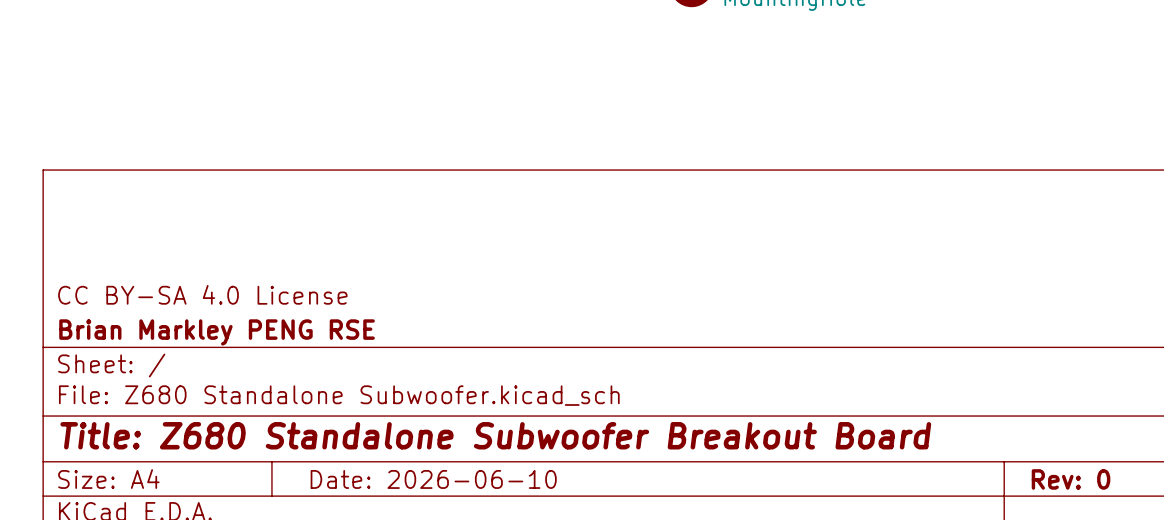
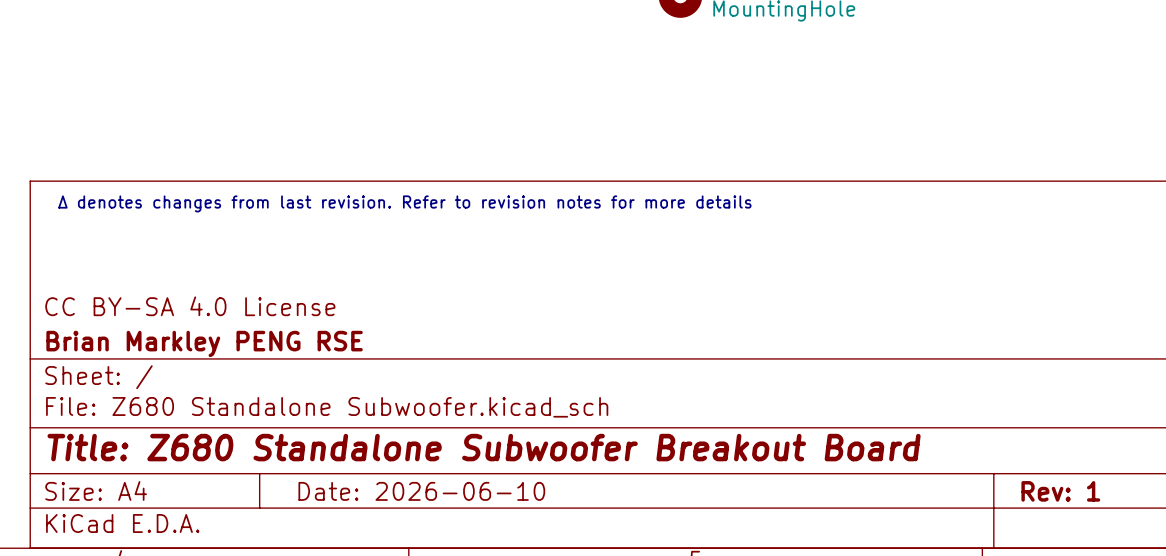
text: none -> Δ denotes changes from last revision. Refer to revision notes for more details (404, 203)
title block: Rev: 0 (1071, 479) -> Rev: 1 (1060, 491)

